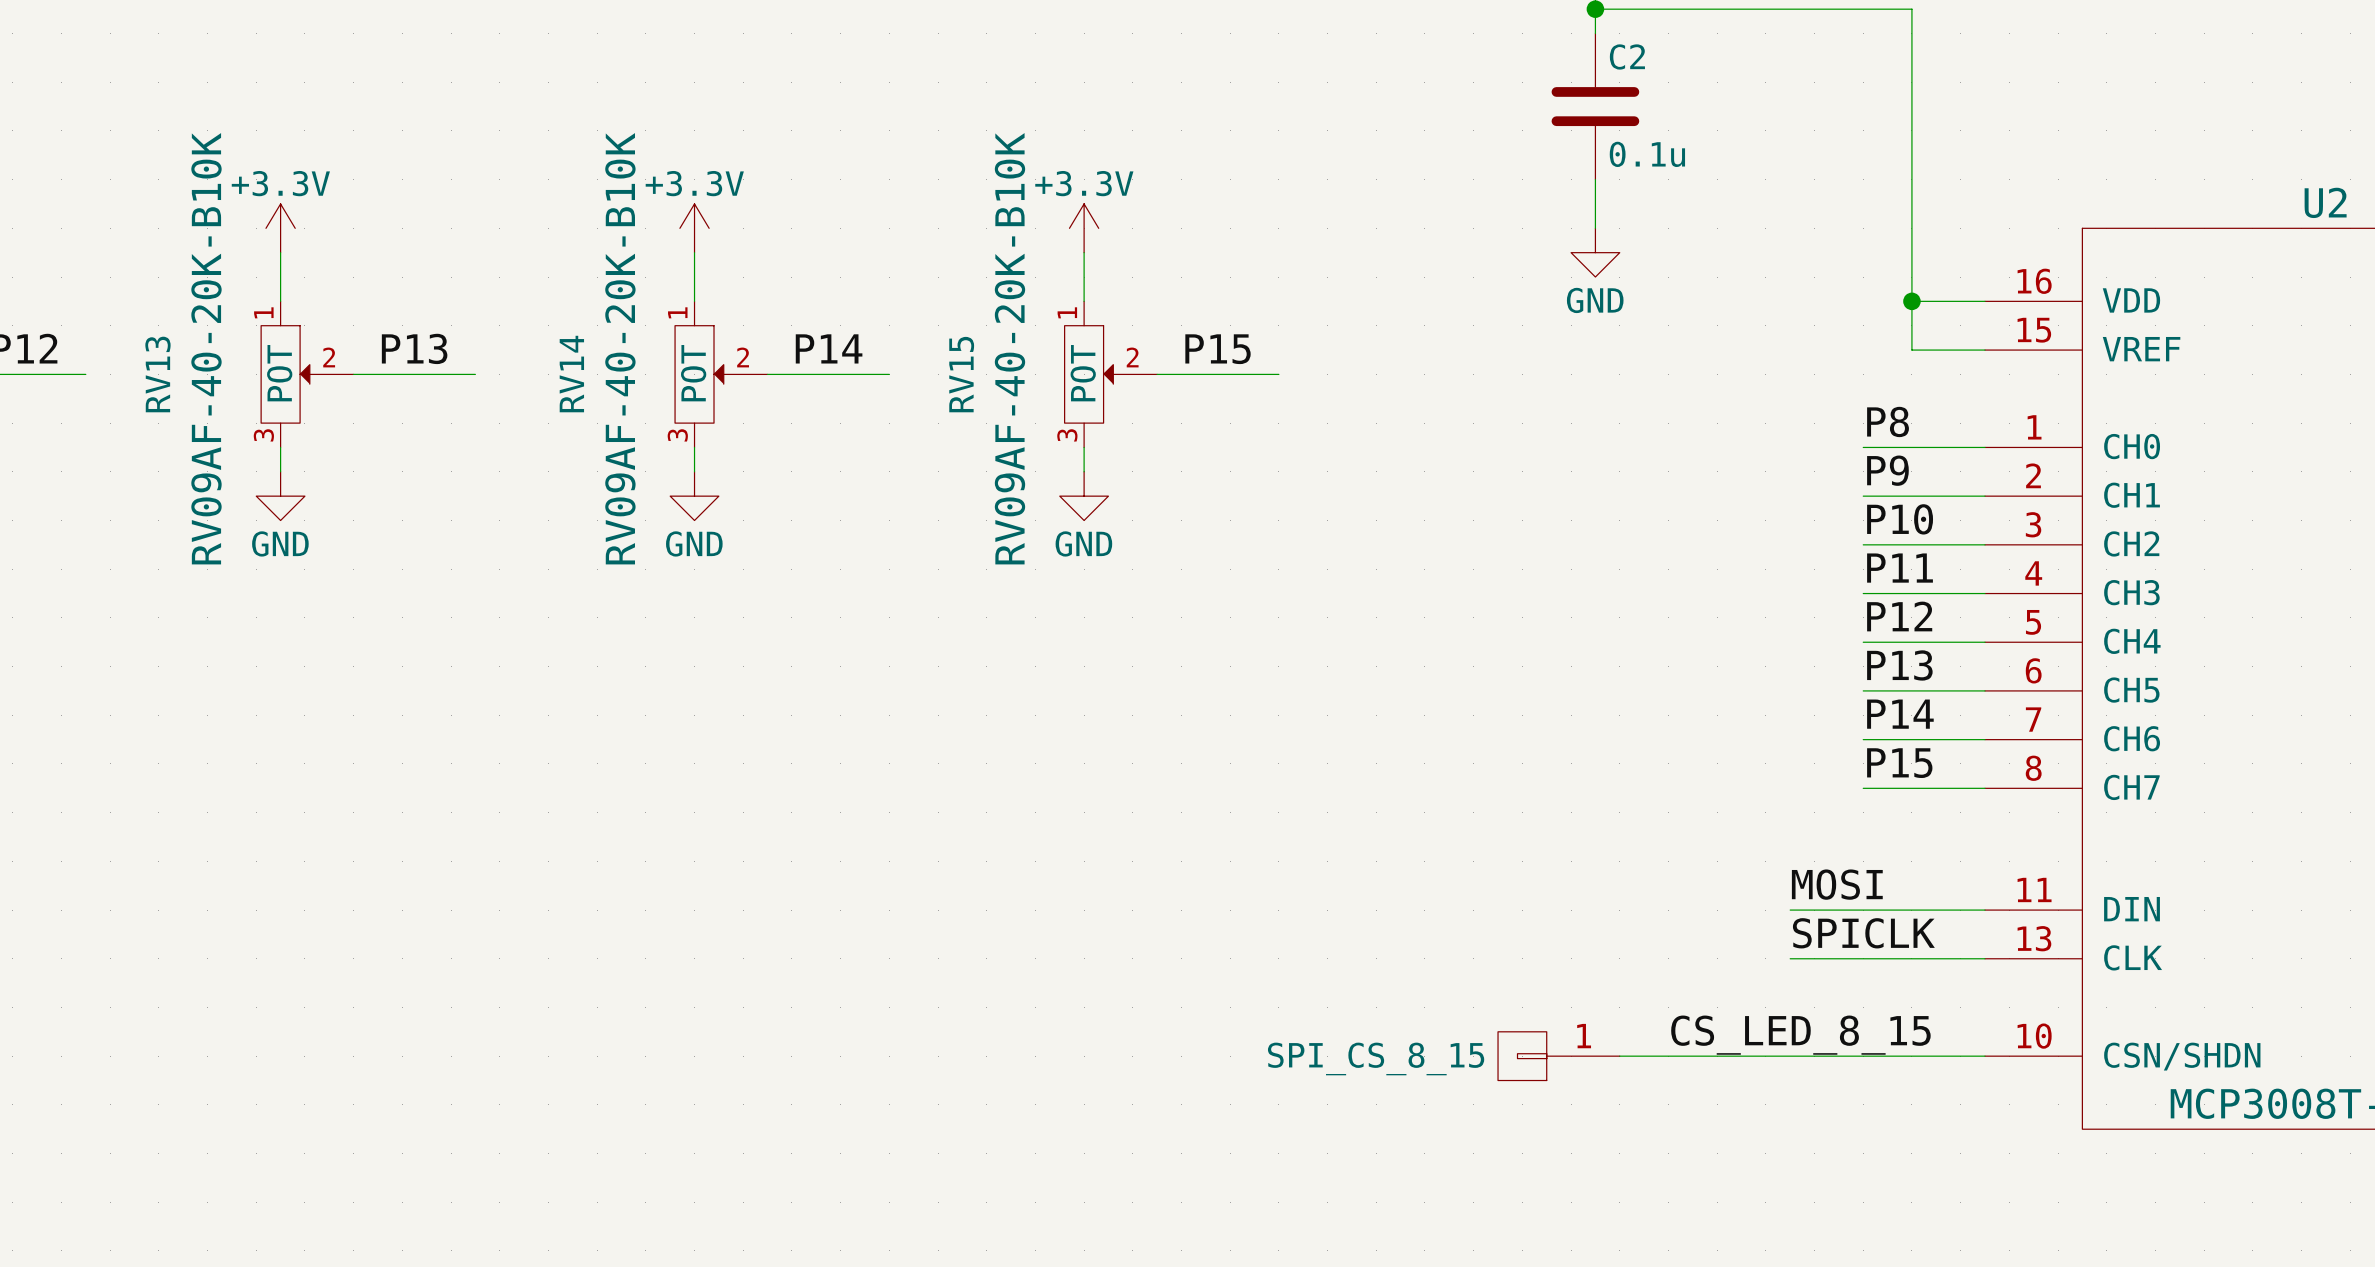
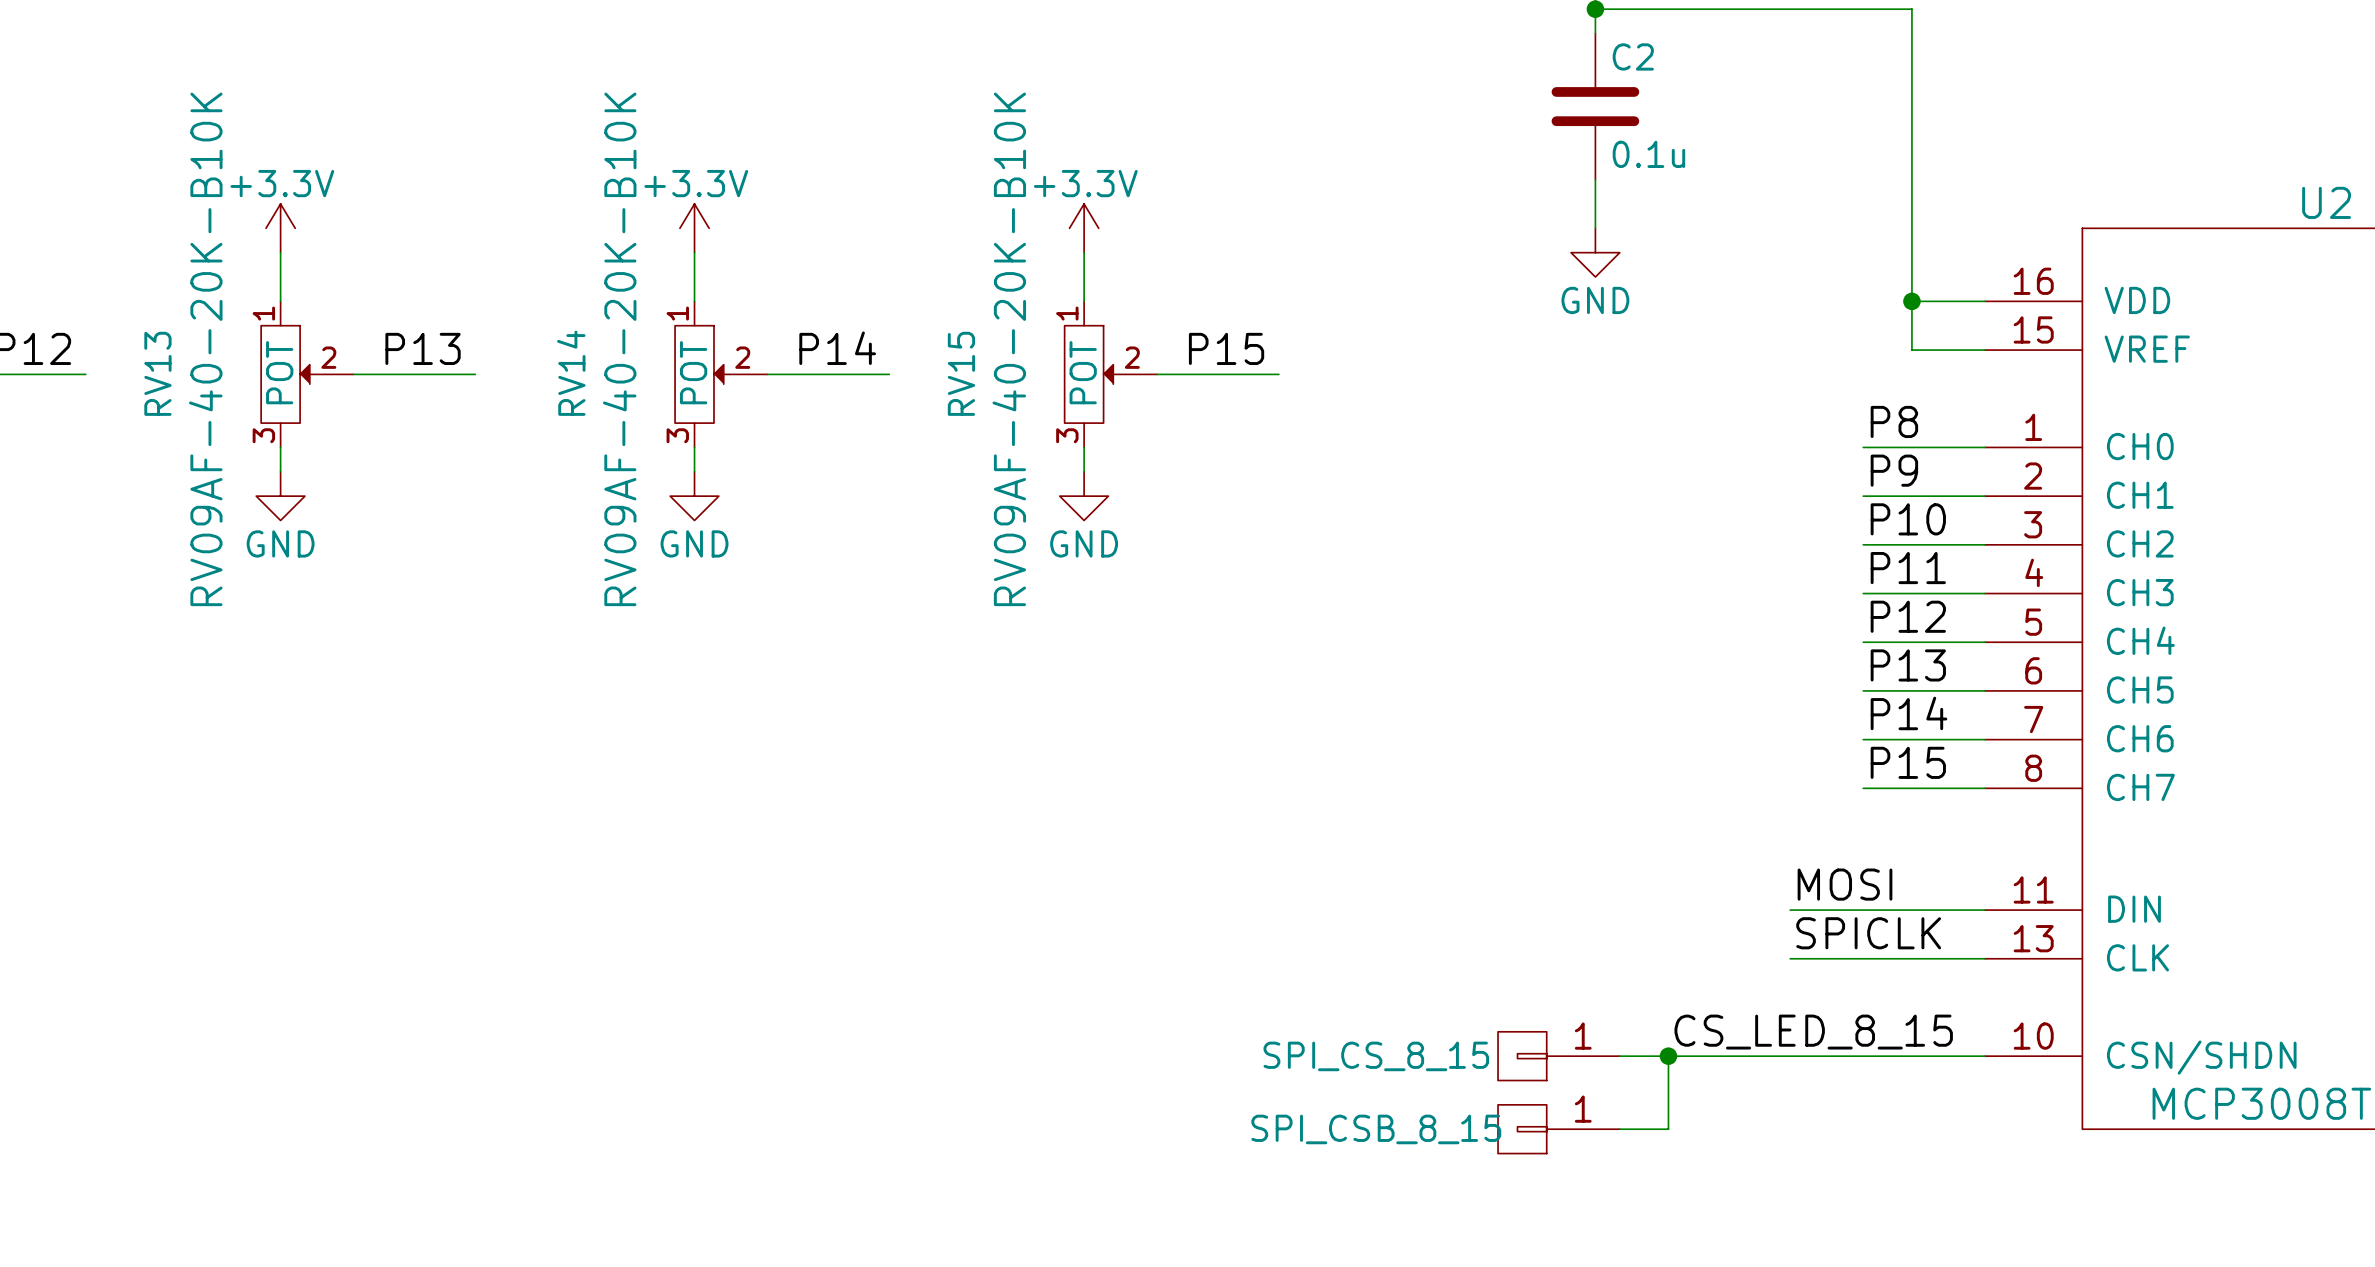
wire: none -> (1668, 1056) (1668, 1129) (1619, 1129)
junction: none -> (1668, 1056)
SPI_CSB_8_15: none -> (1558, 1129)

